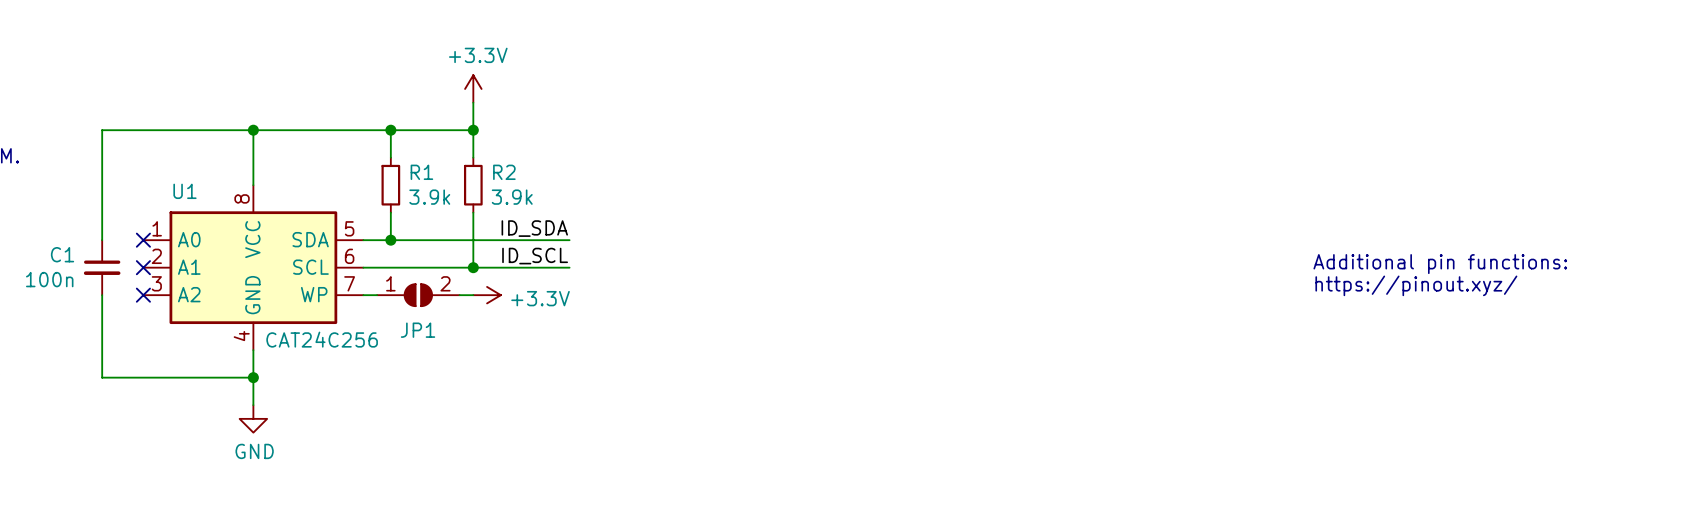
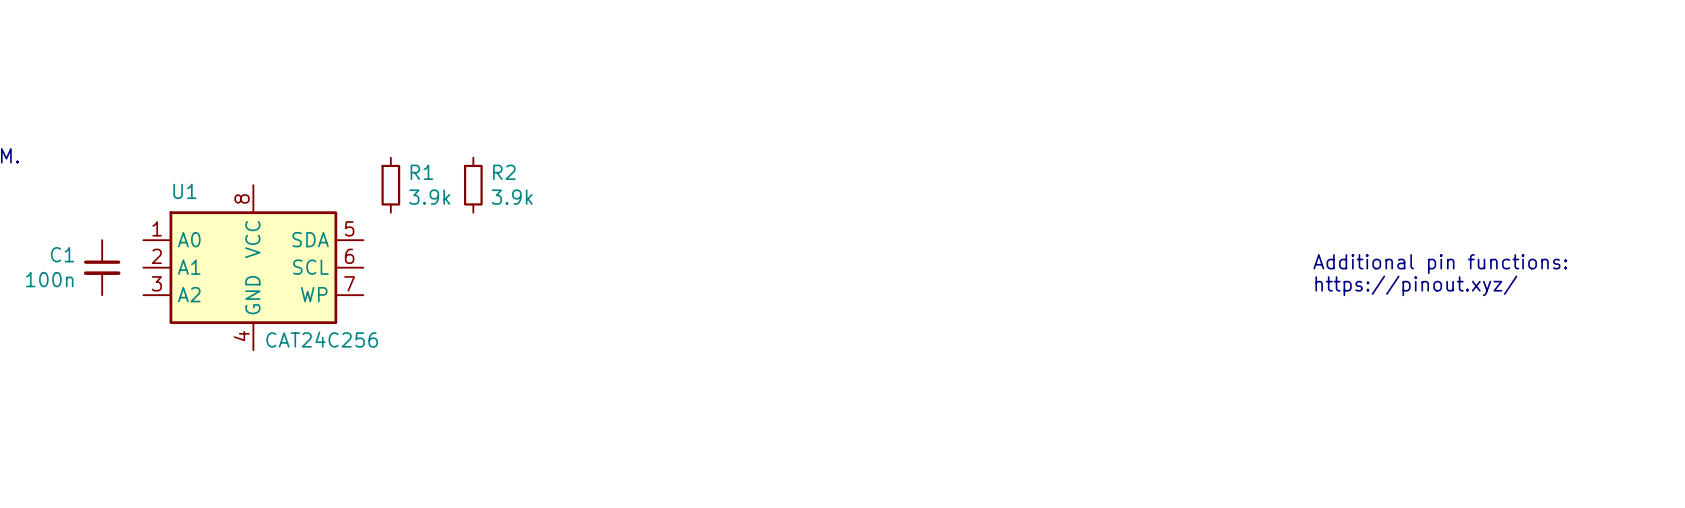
power symbol: +3.3V (473, 88) -> none
wire: (473, 102) (473, 157) -> none
wire: (253, 130) (253, 185) -> none
junction: (253, 130) -> none
wire: (390, 130) (390, 157) -> none
junction: (390, 130) -> none
wire: (473, 130) (102, 130) (102, 240) -> none
junction: (473, 130) -> none
wire: (390, 212) (390, 240) -> none
wire: (473, 212) (473, 267) -> none
label: ID_SDA (534, 228) -> none
no-connect mark: (143, 240) -> none
wire: (363, 240) (569, 240) -> none
junction: (390, 240) -> none
label: ID_SCL (535, 256) -> none
no-connect mark: (143, 267) -> none
wire: (363, 267) (569, 267) -> none
junction: (473, 267) -> none
wire: (102, 295) (102, 377) (253, 377) -> none
no-connect mark: (143, 295) -> none
wire: (363, 295) (377, 295) -> none
JP1: (418, 295) -> none
wire: (459, 295) (473, 295) -> none
power symbol: +3.3V (487, 295) -> none
wire: (253, 350) (253, 405) -> none
junction: (253, 377) -> none
power symbol: GND (253, 418) -> none

